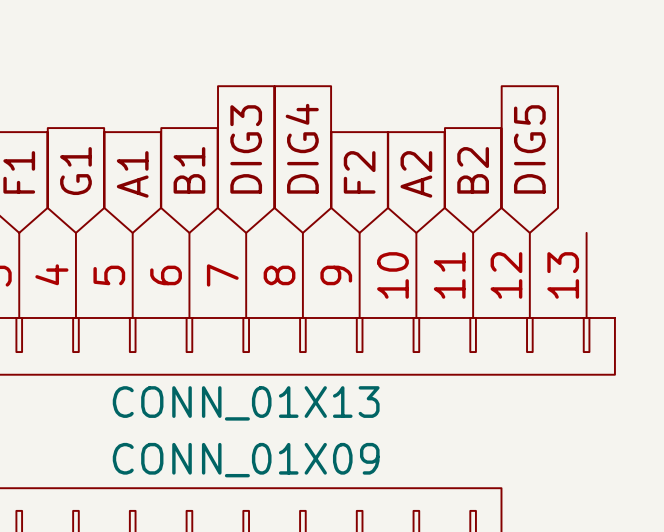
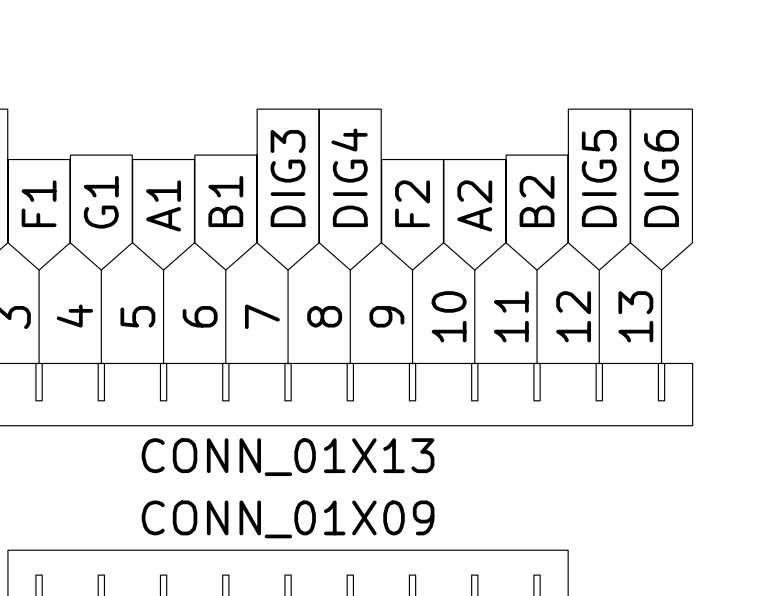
global label: none -> DIG6 (661, 178)

